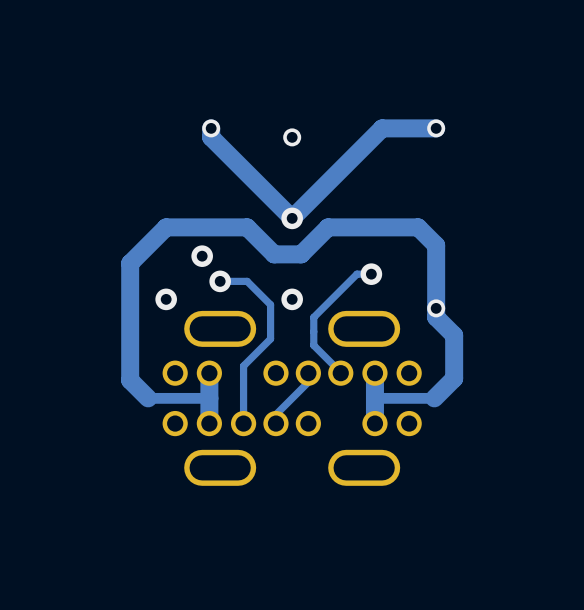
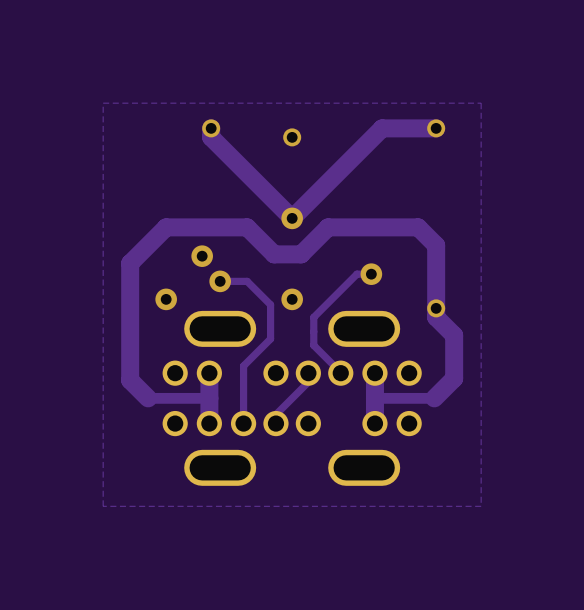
zone outline: none -> (481, 103) (103, 103) (103, 506) (481, 506) (481, 103)

